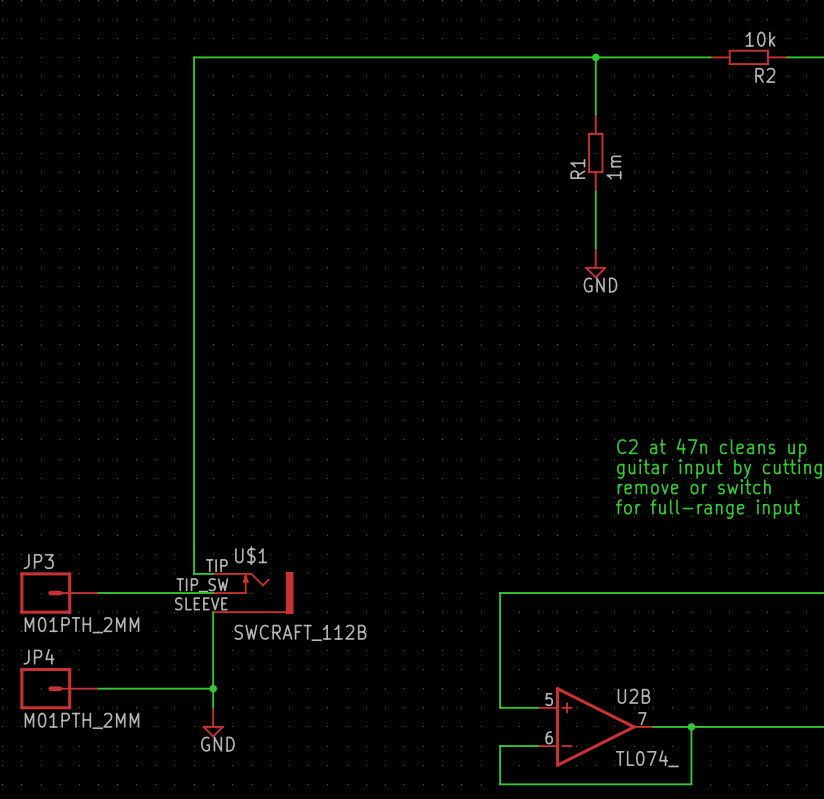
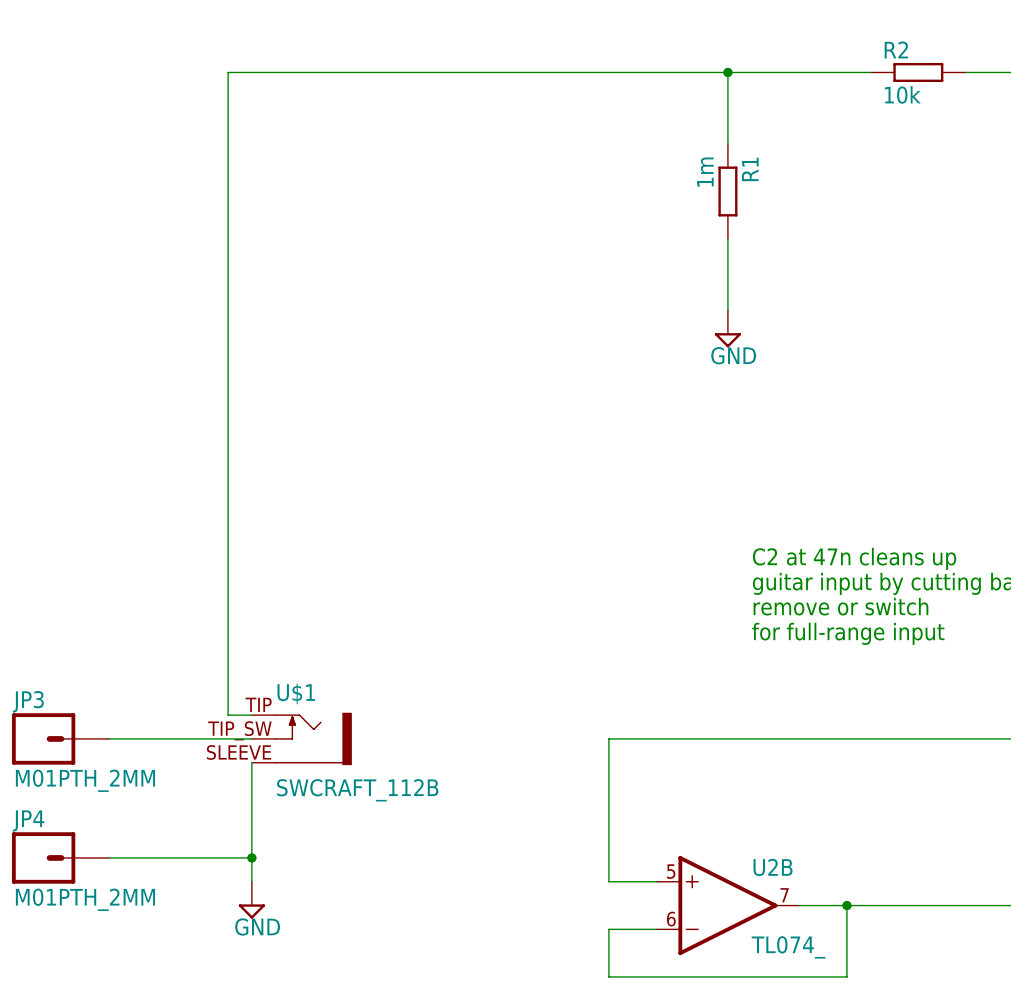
R2 value position: 10k (760, 39) -> 10k (902, 94)
R2 name position: R2 (765, 75) -> R2 (896, 49)
R1 value position: 1m (613, 167) -> 1m (705, 172)
R1 name position: R1 (577, 168) -> R1 (750, 169)

